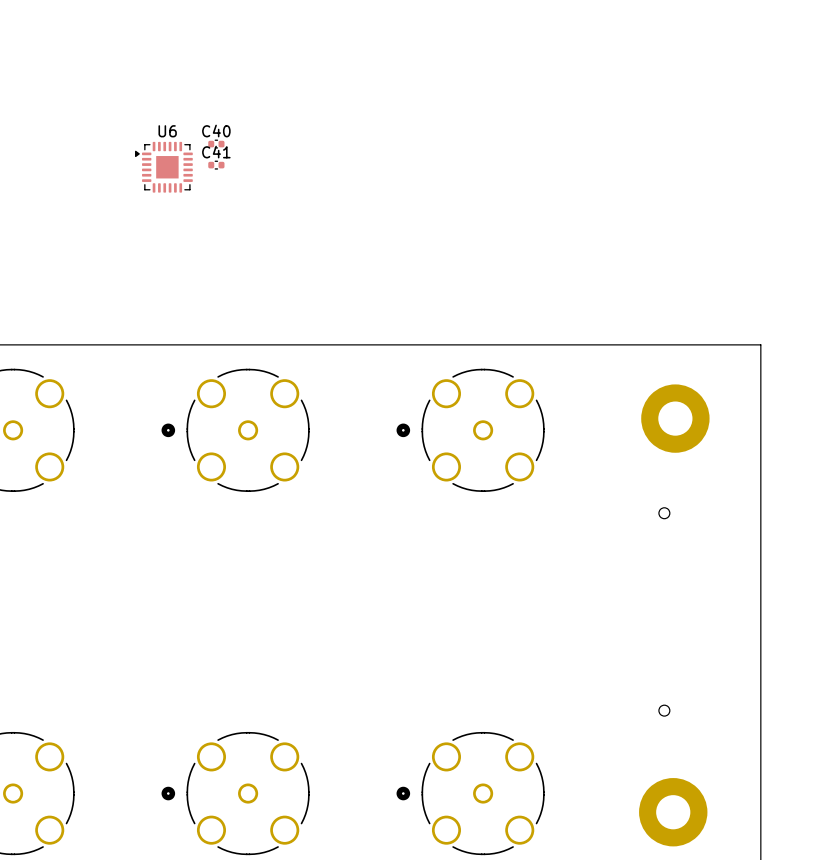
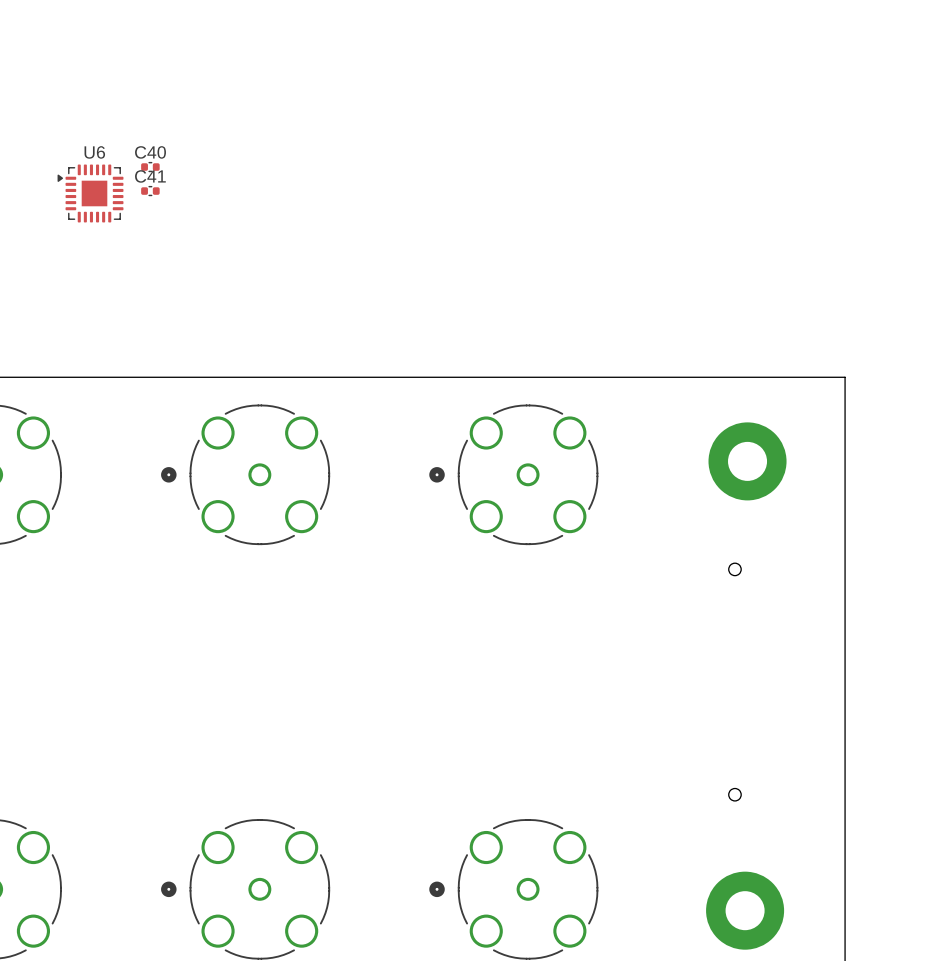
C40 position: (216, 144) -> (150, 167)
C41 position: (216, 165) -> (150, 191)
U6 position: (163, 167) -> (90, 193)

